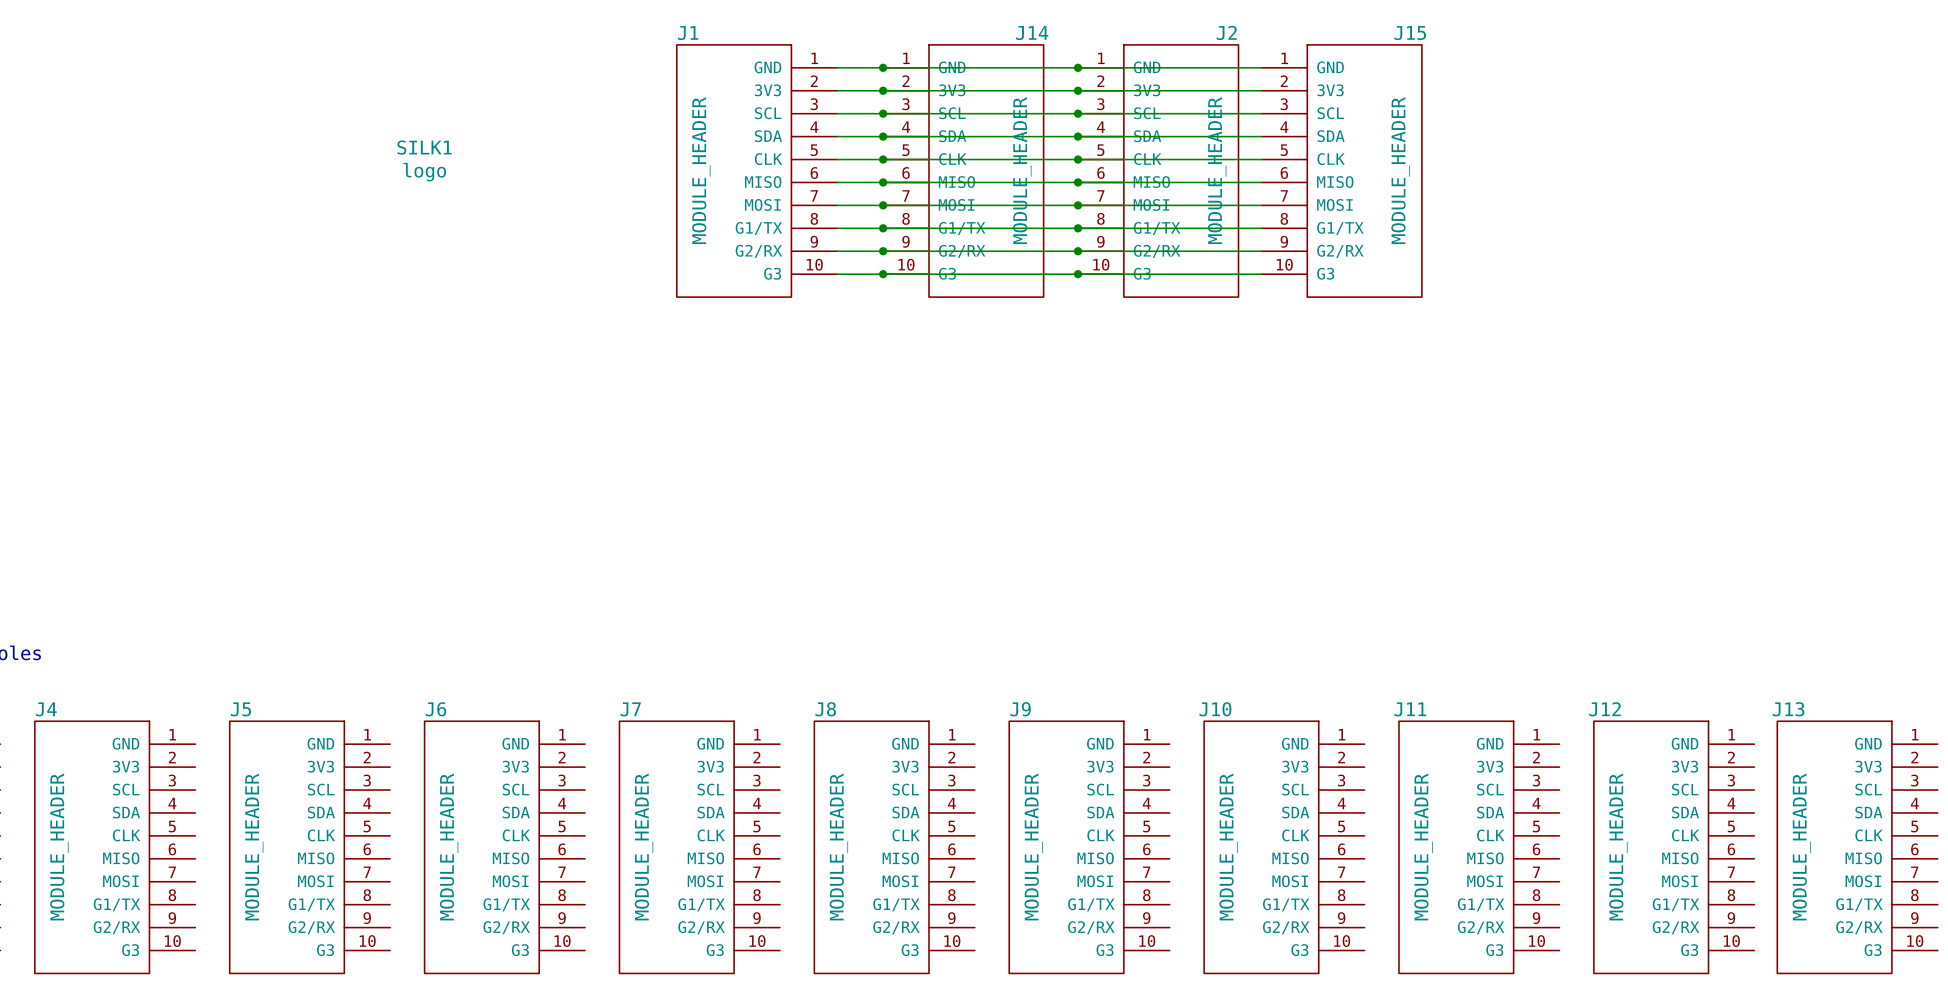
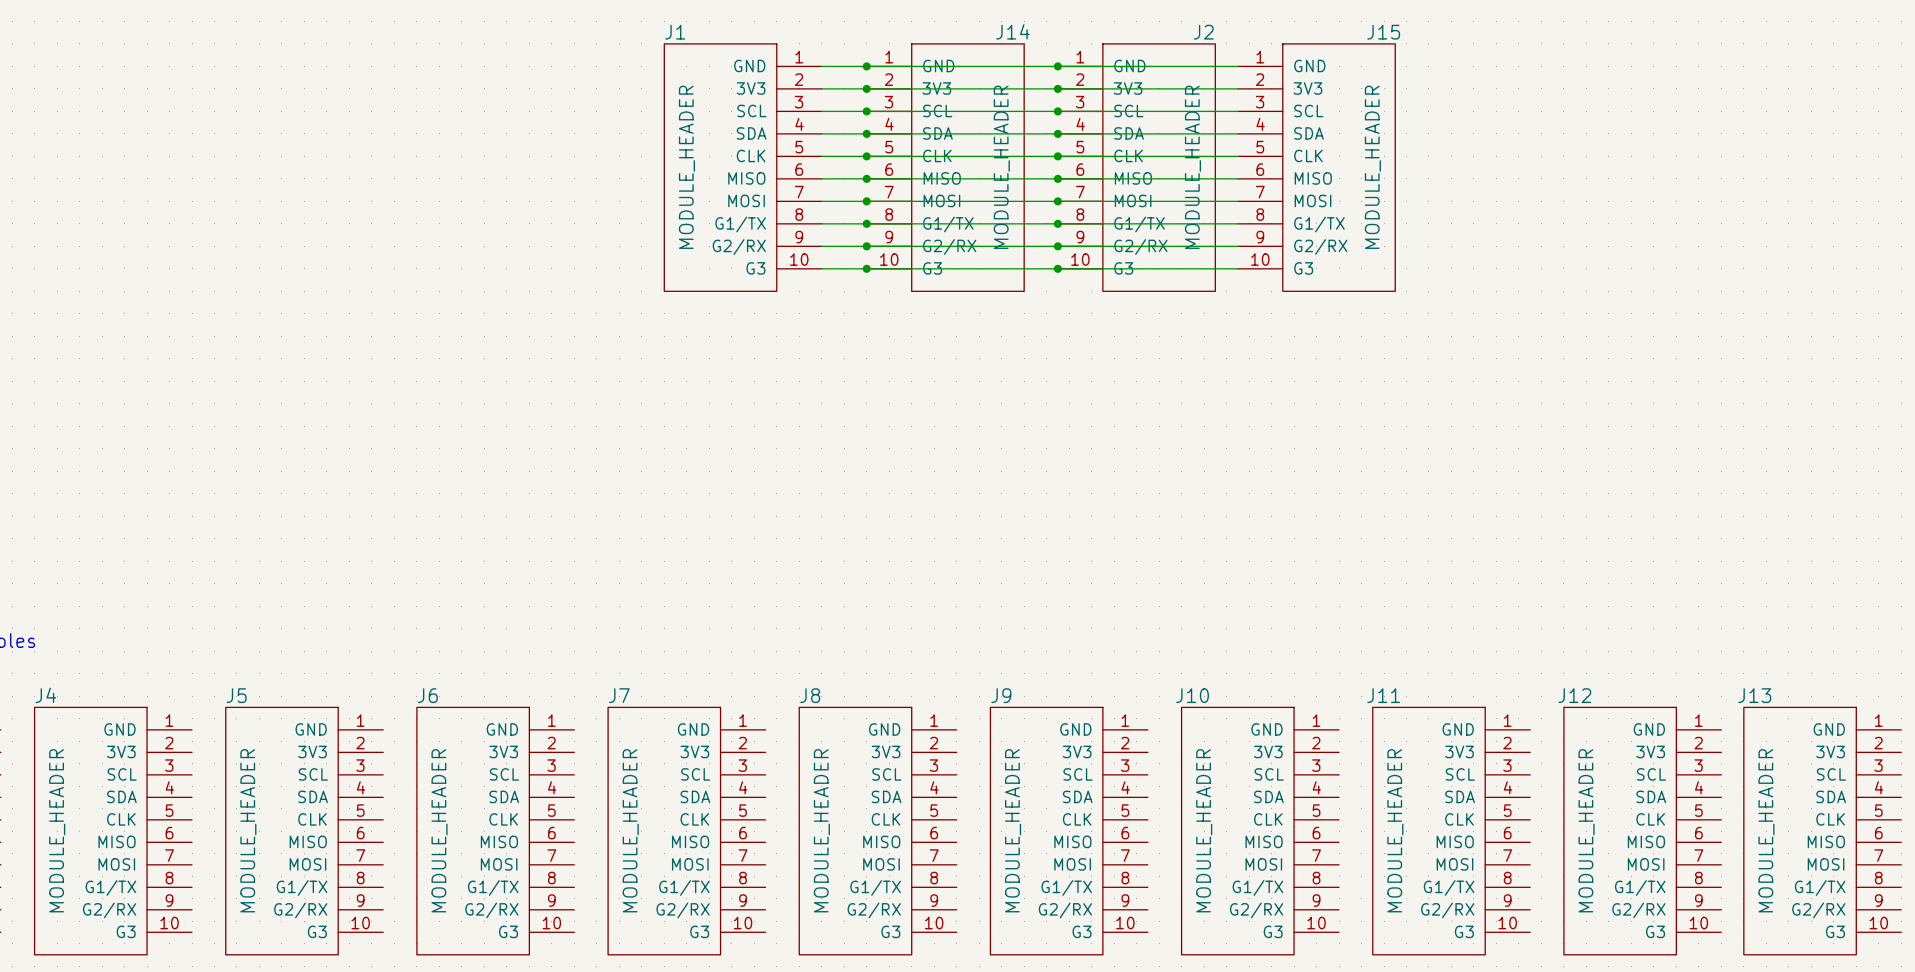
SILK1: logo (424, 160) -> none

